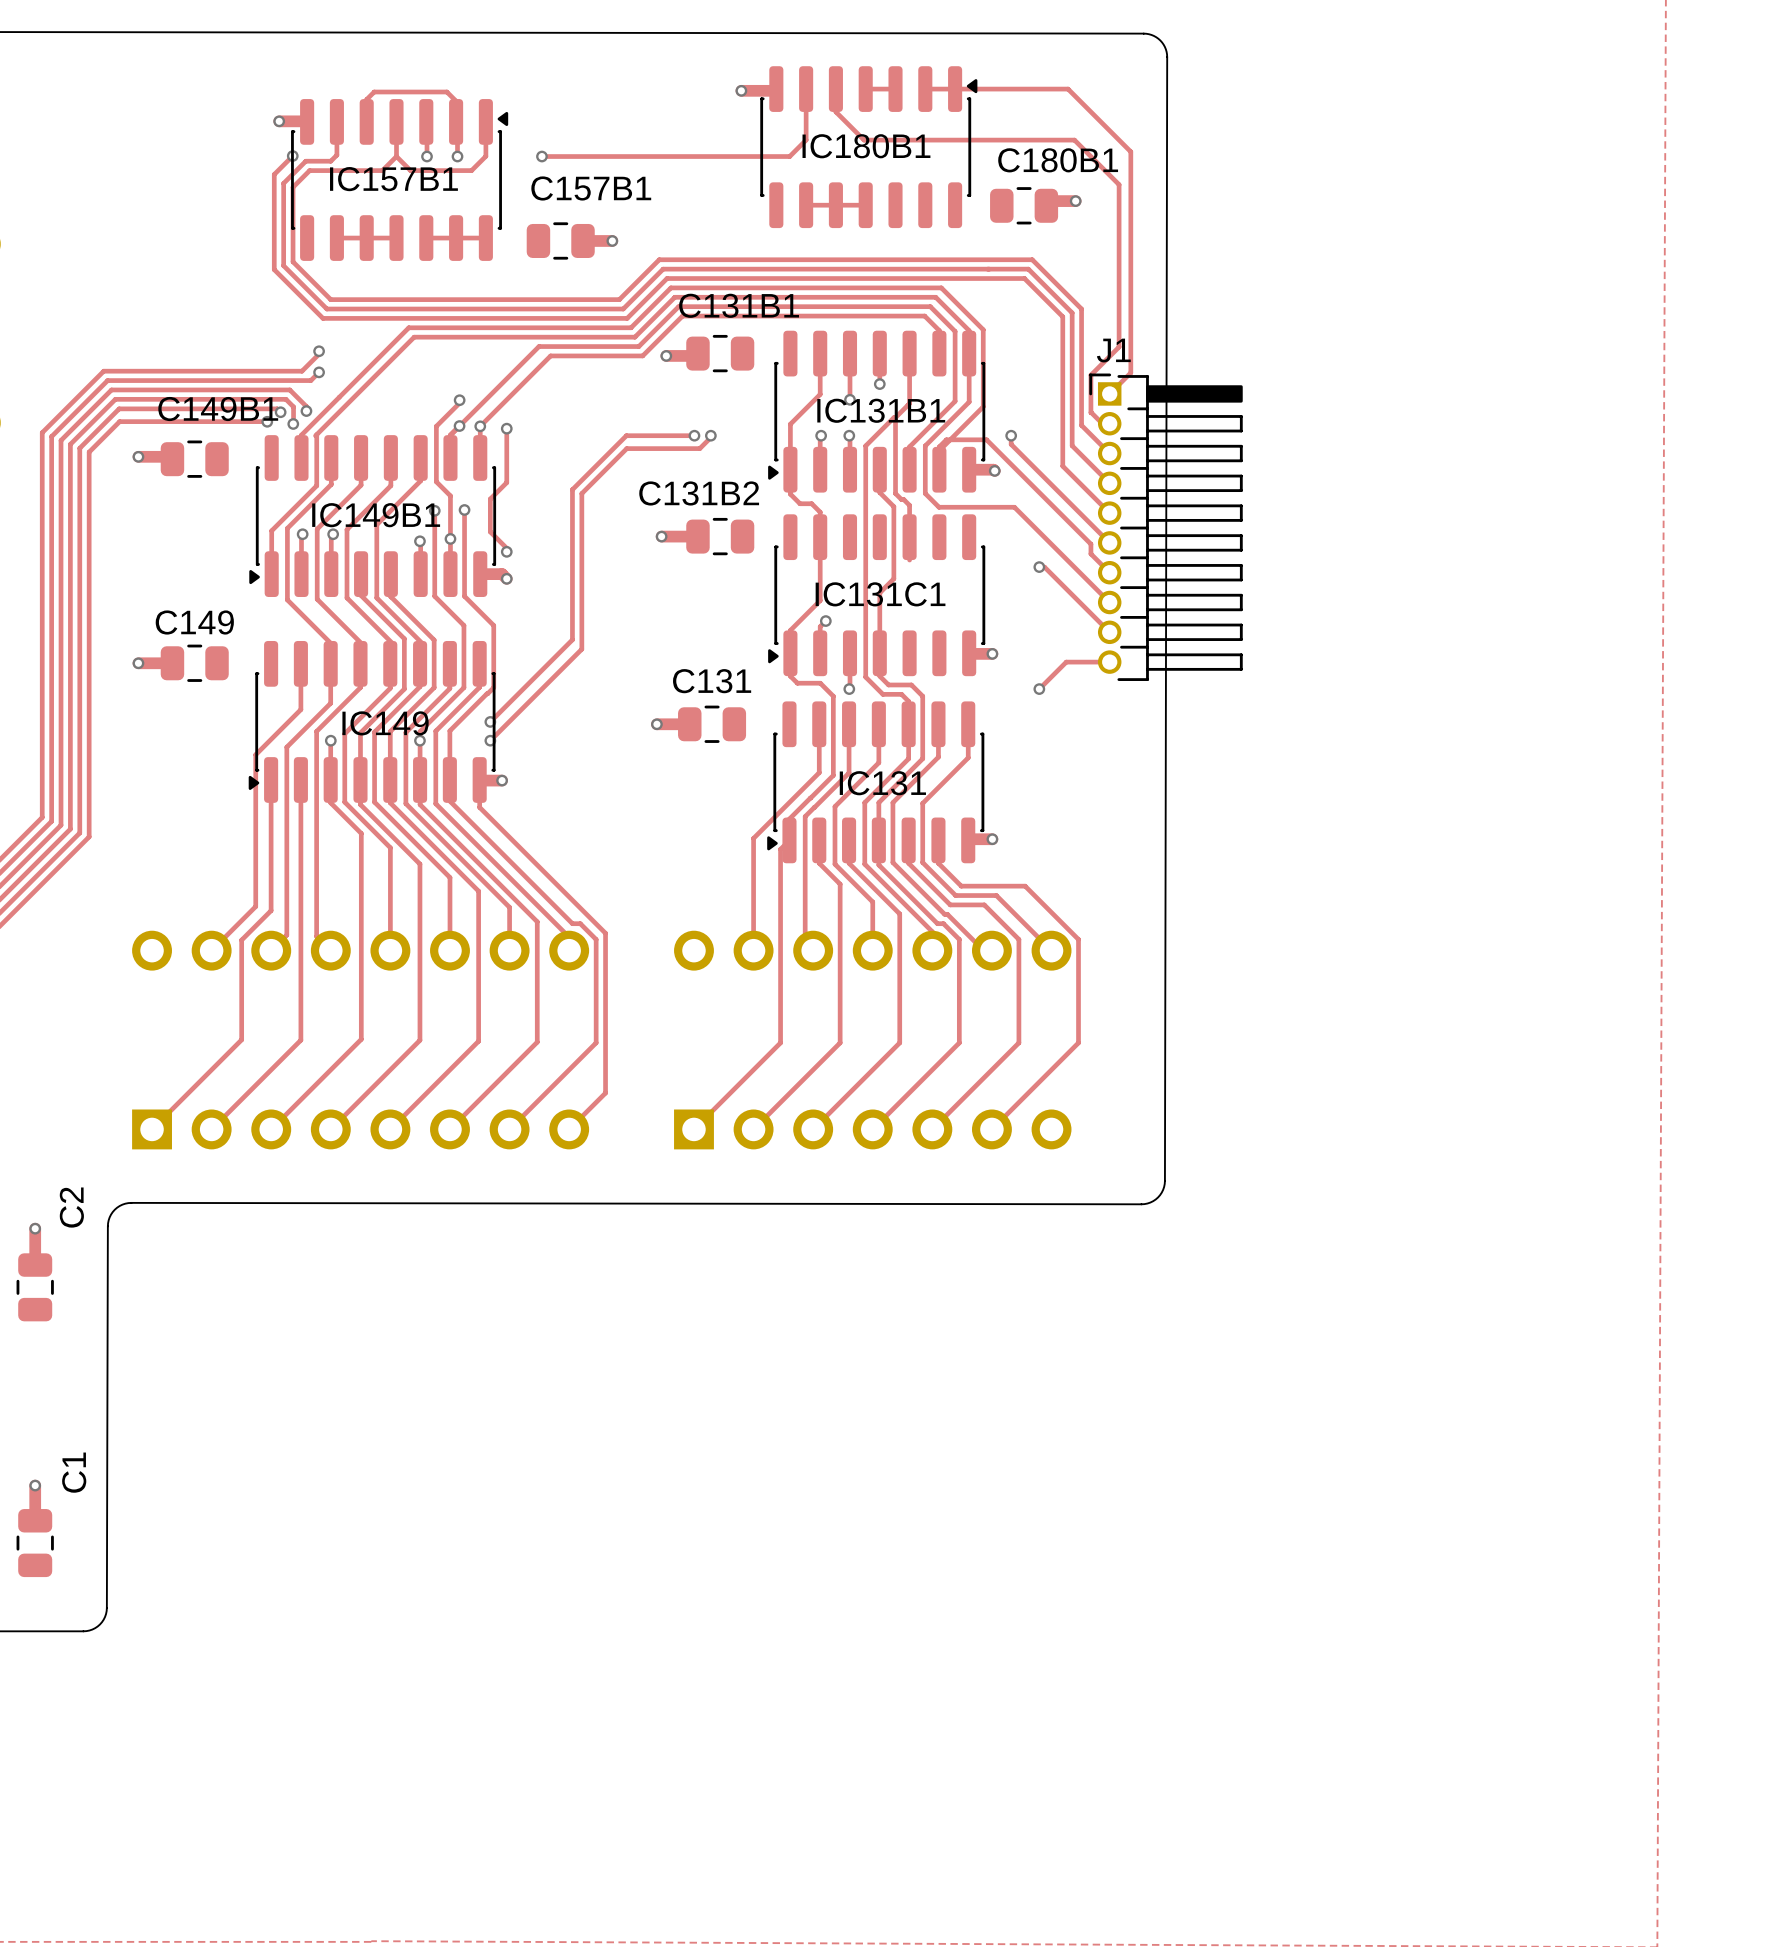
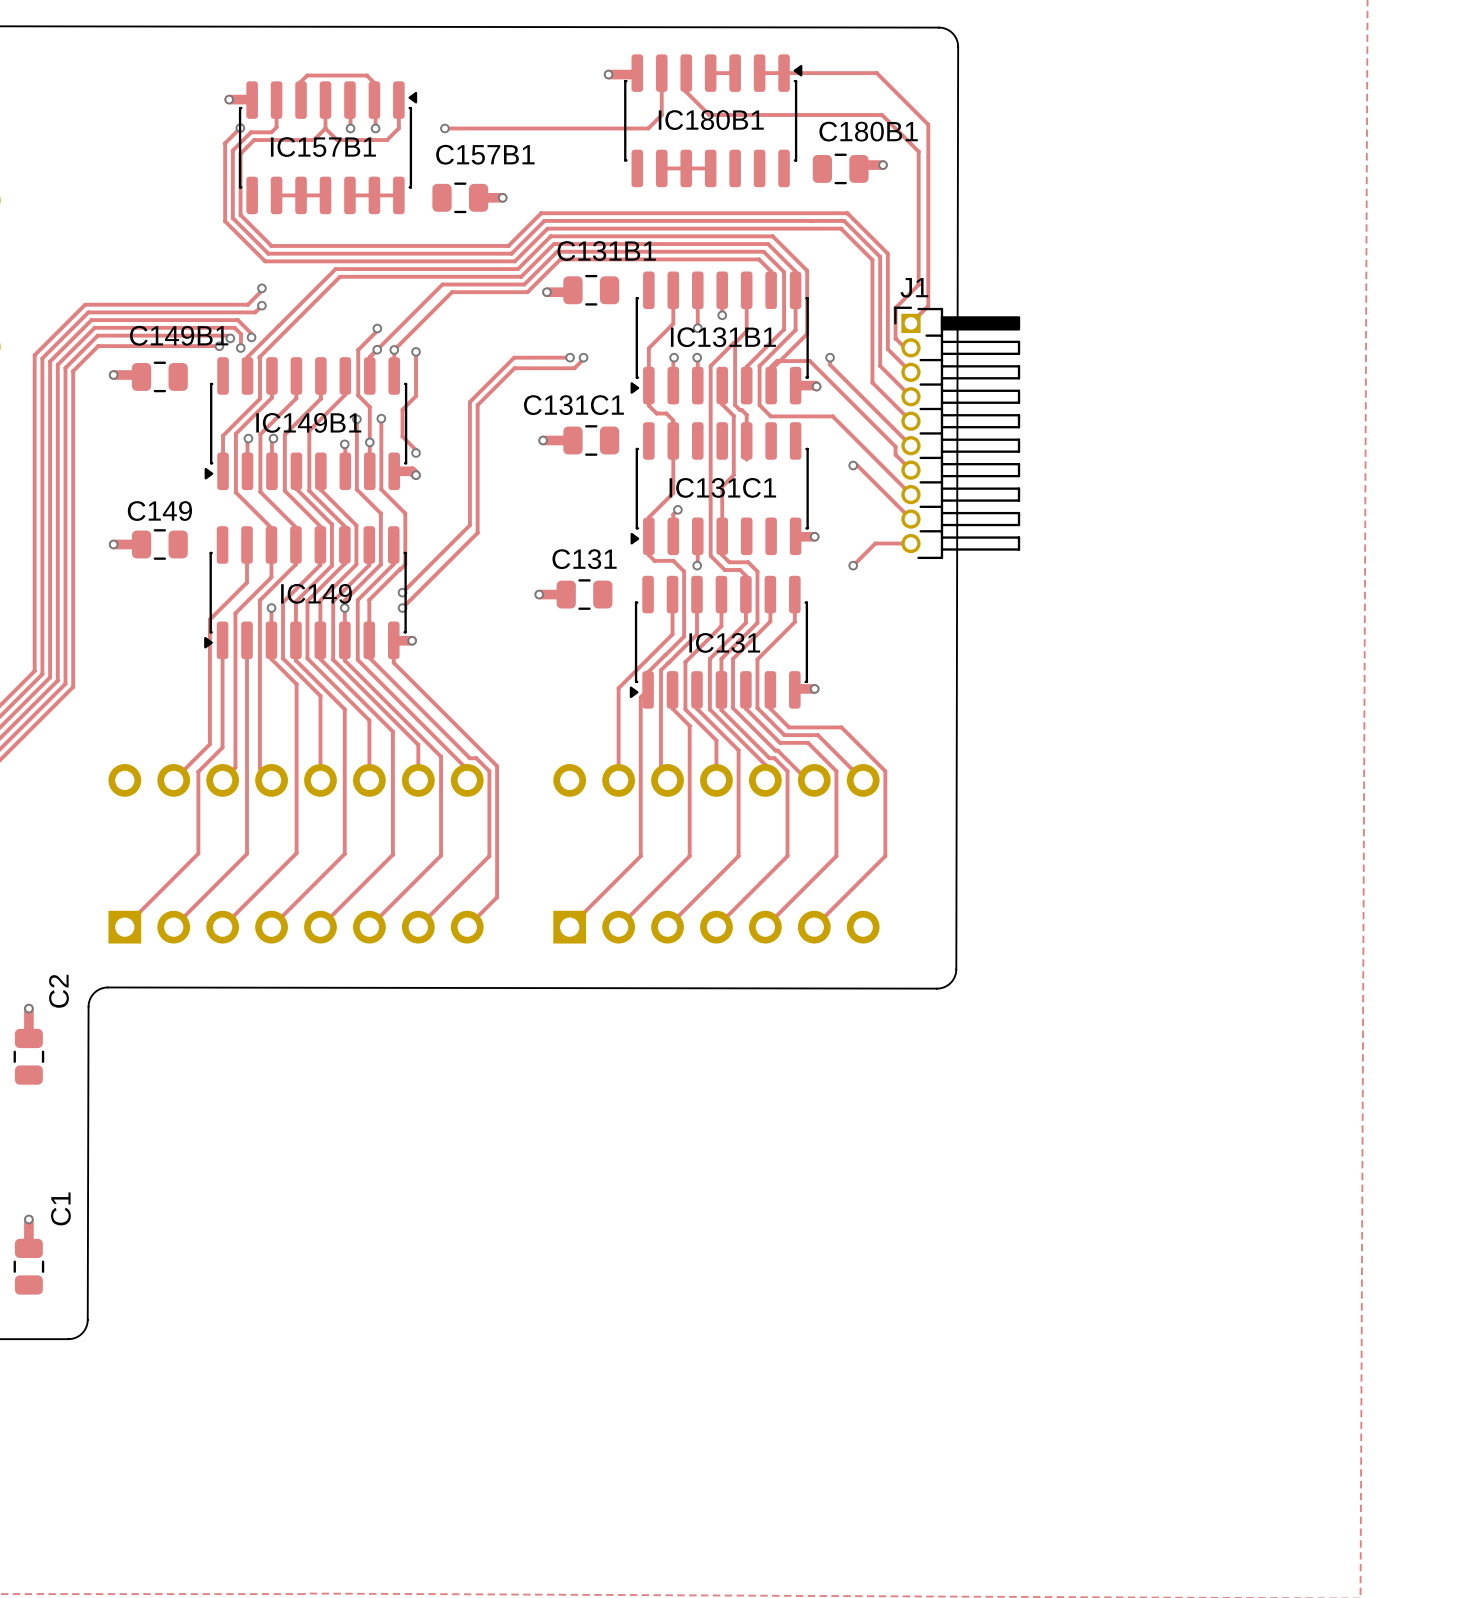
C131B2 name: C131B2 (699, 493) -> C131C1 (573, 405)

